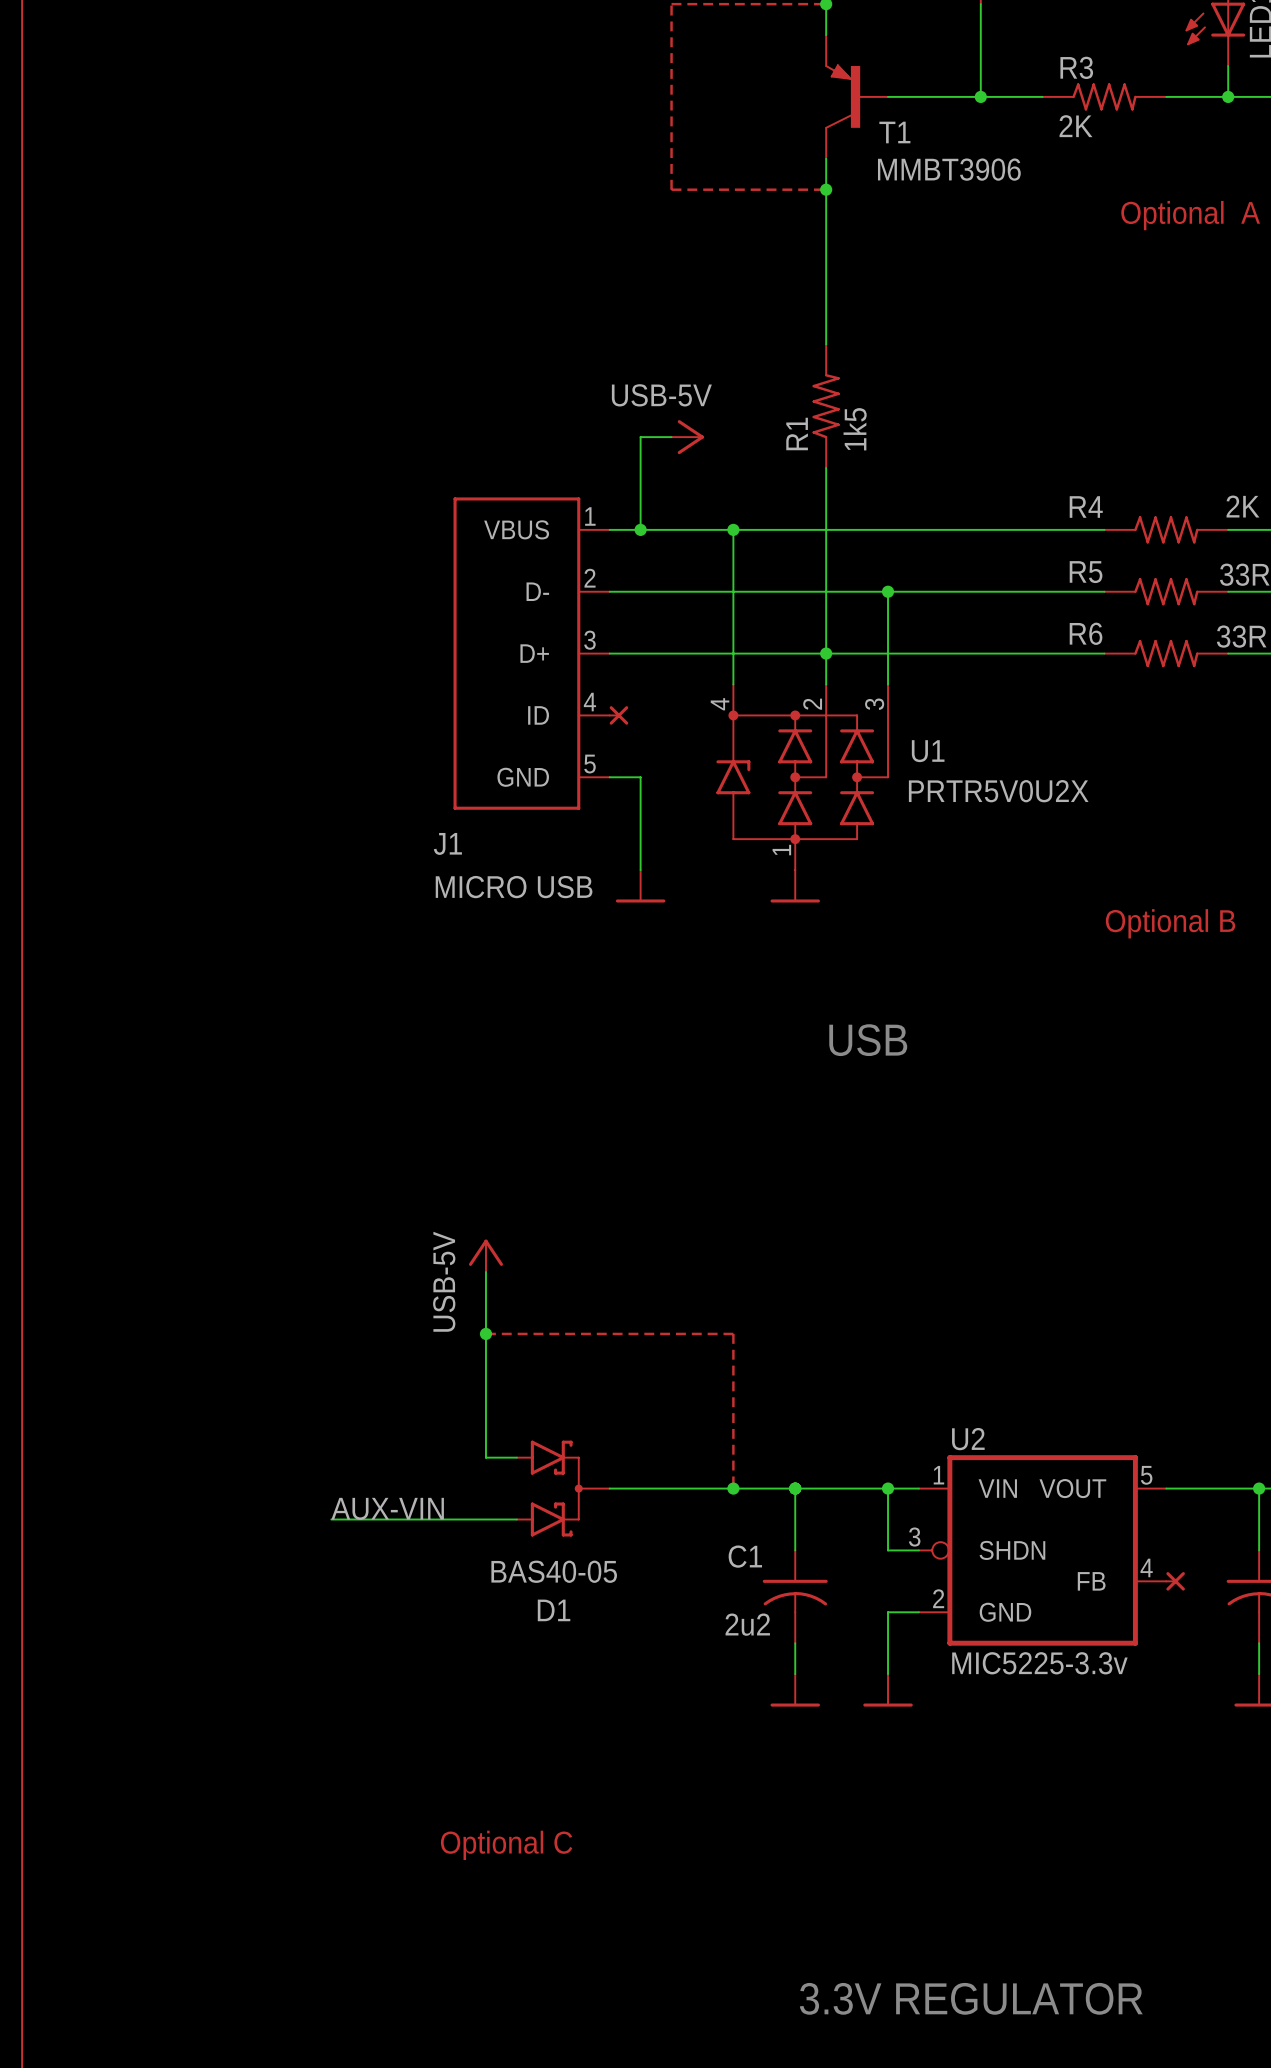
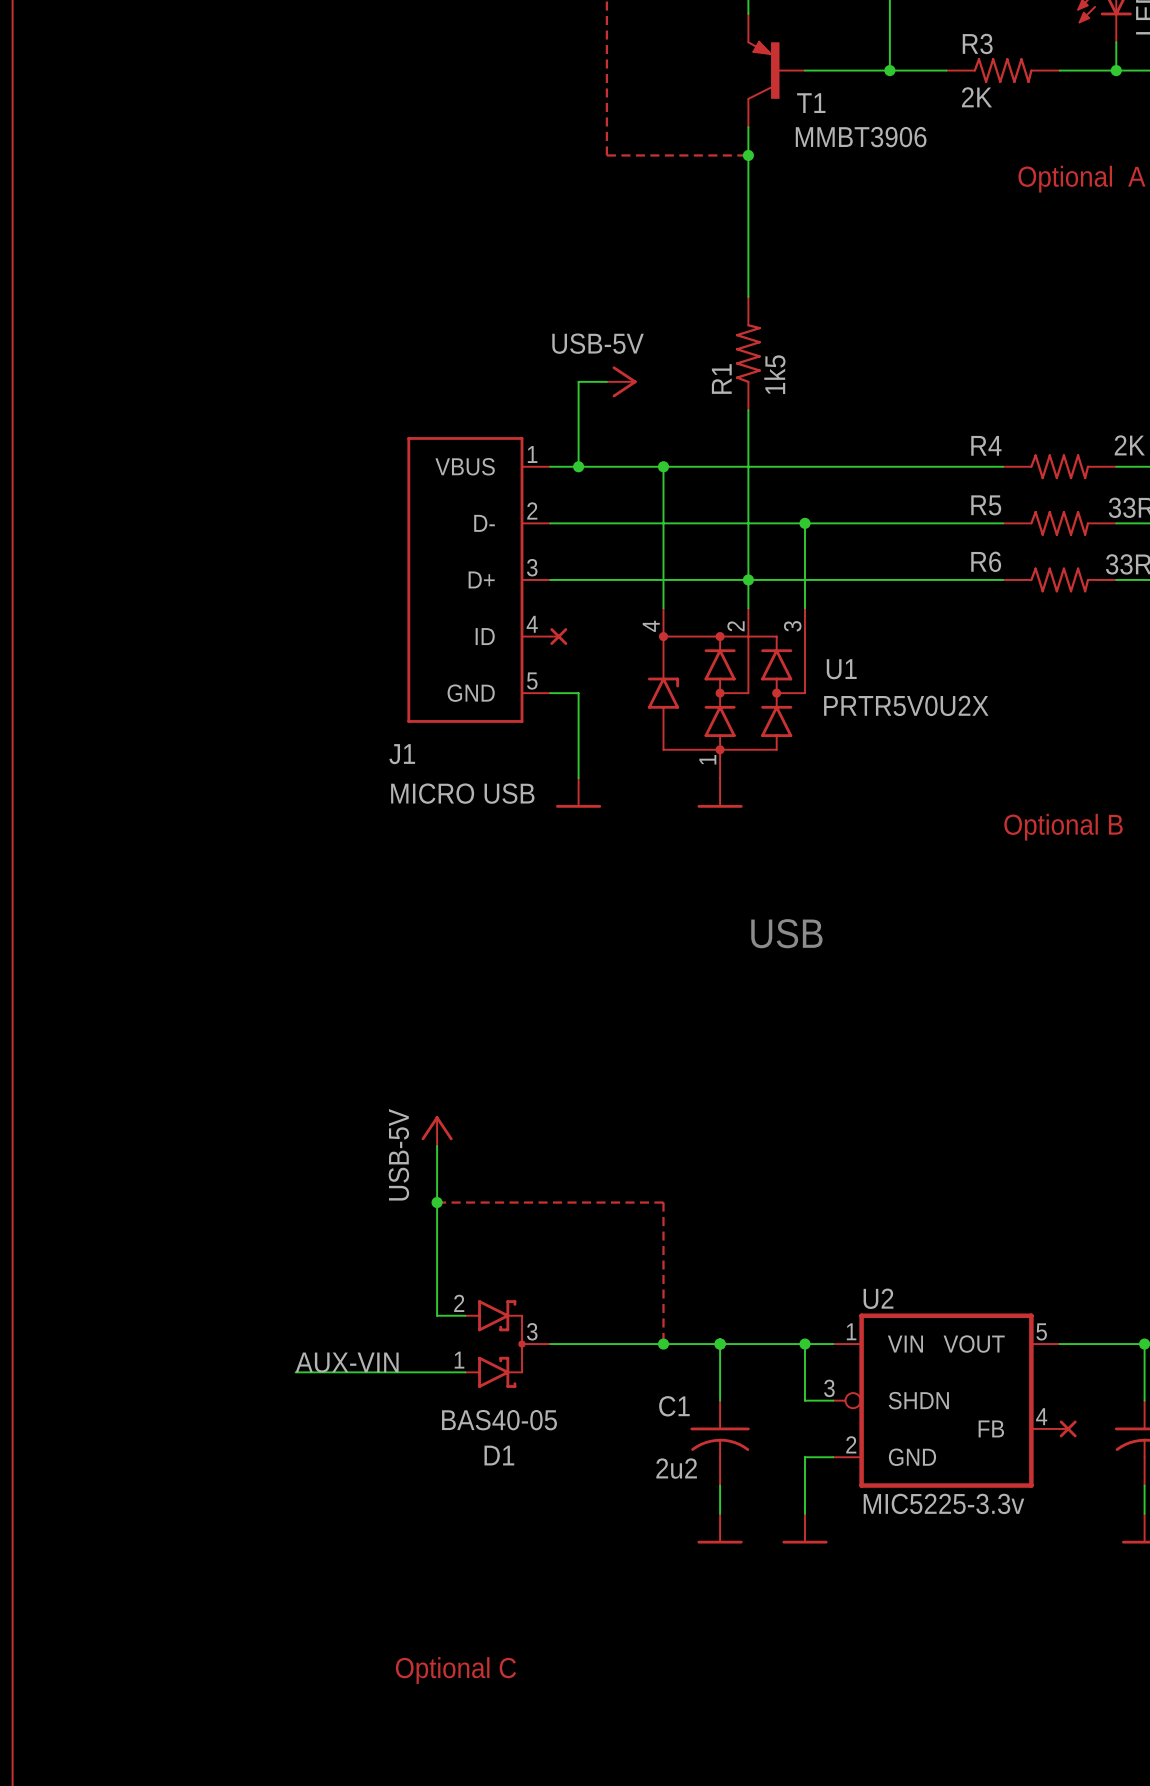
D1 pin number: none -> 2 (459, 1303)
D1 pin number: none -> 3 (532, 1331)
D1 pin number: none -> 1 (459, 1360)

